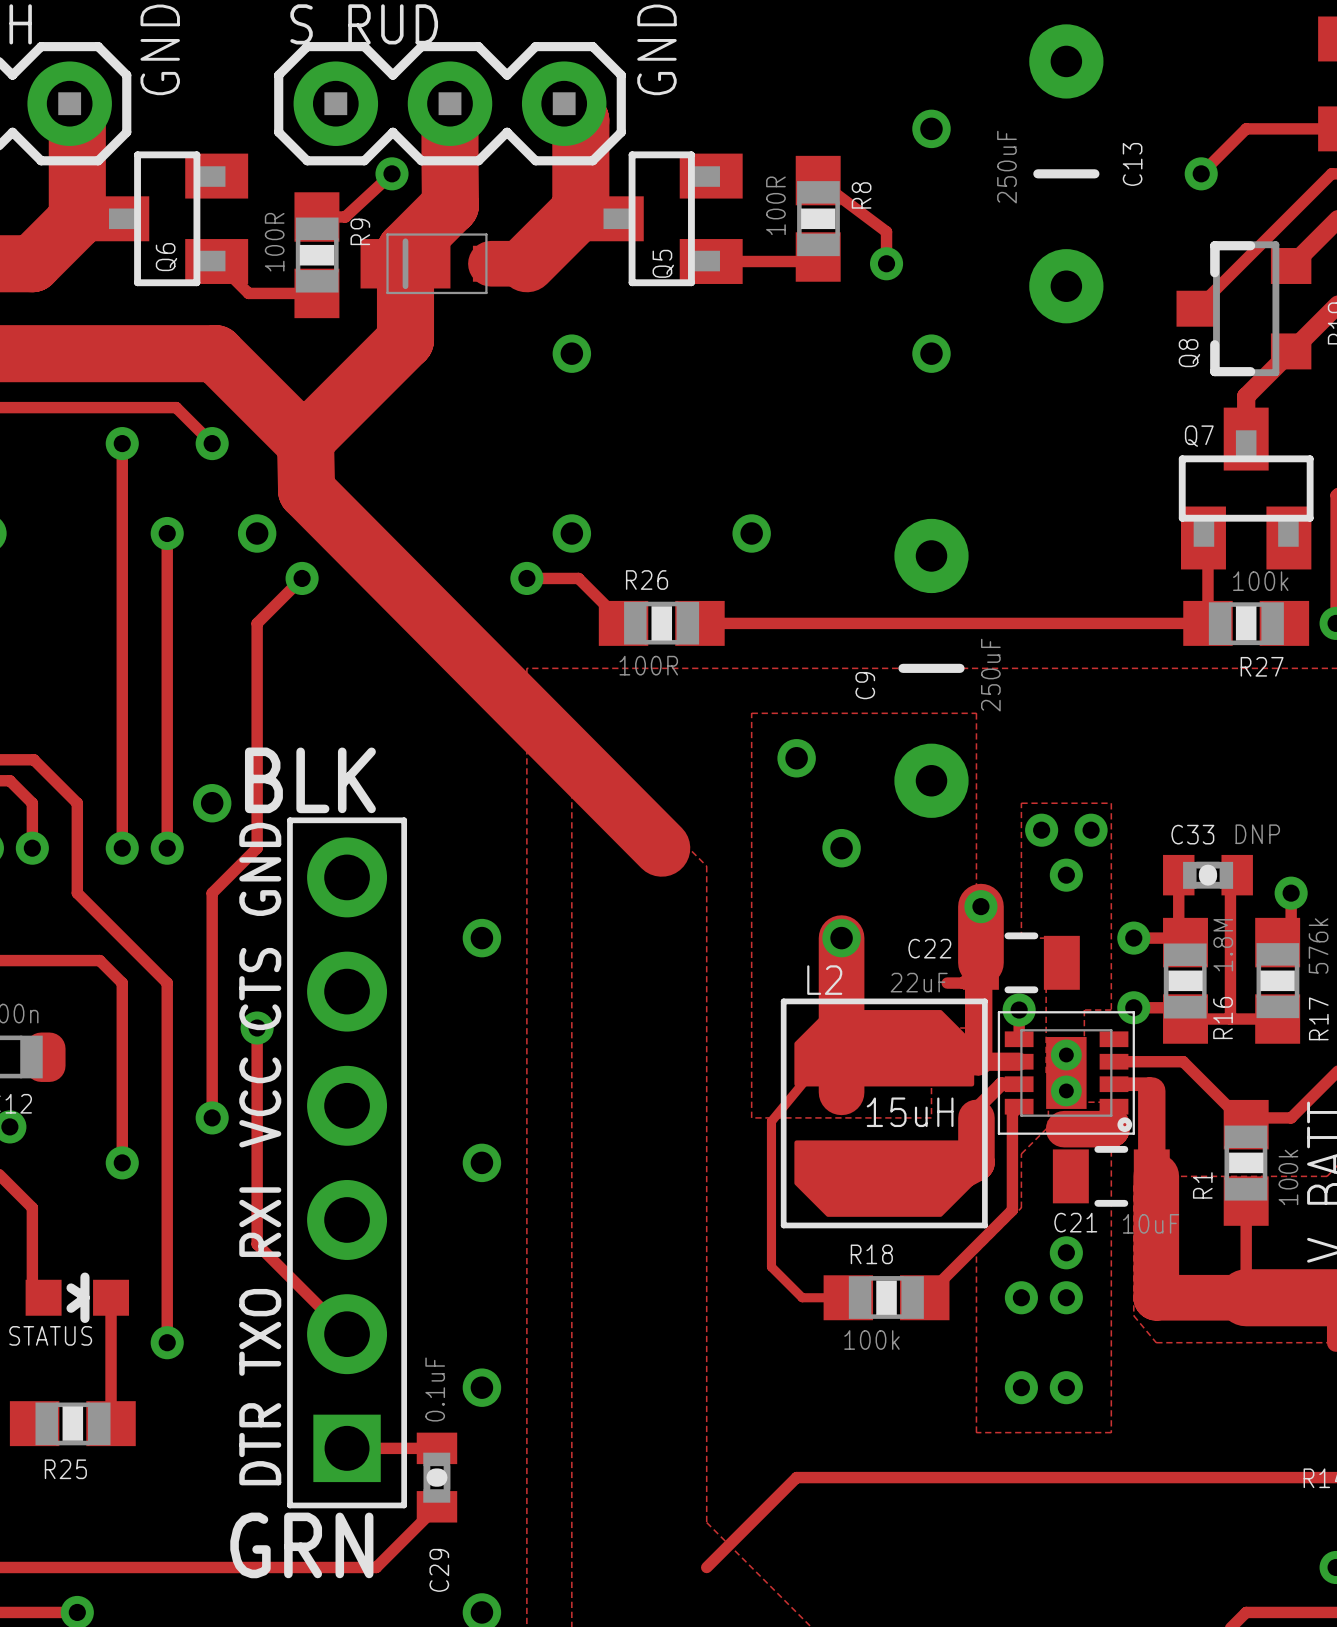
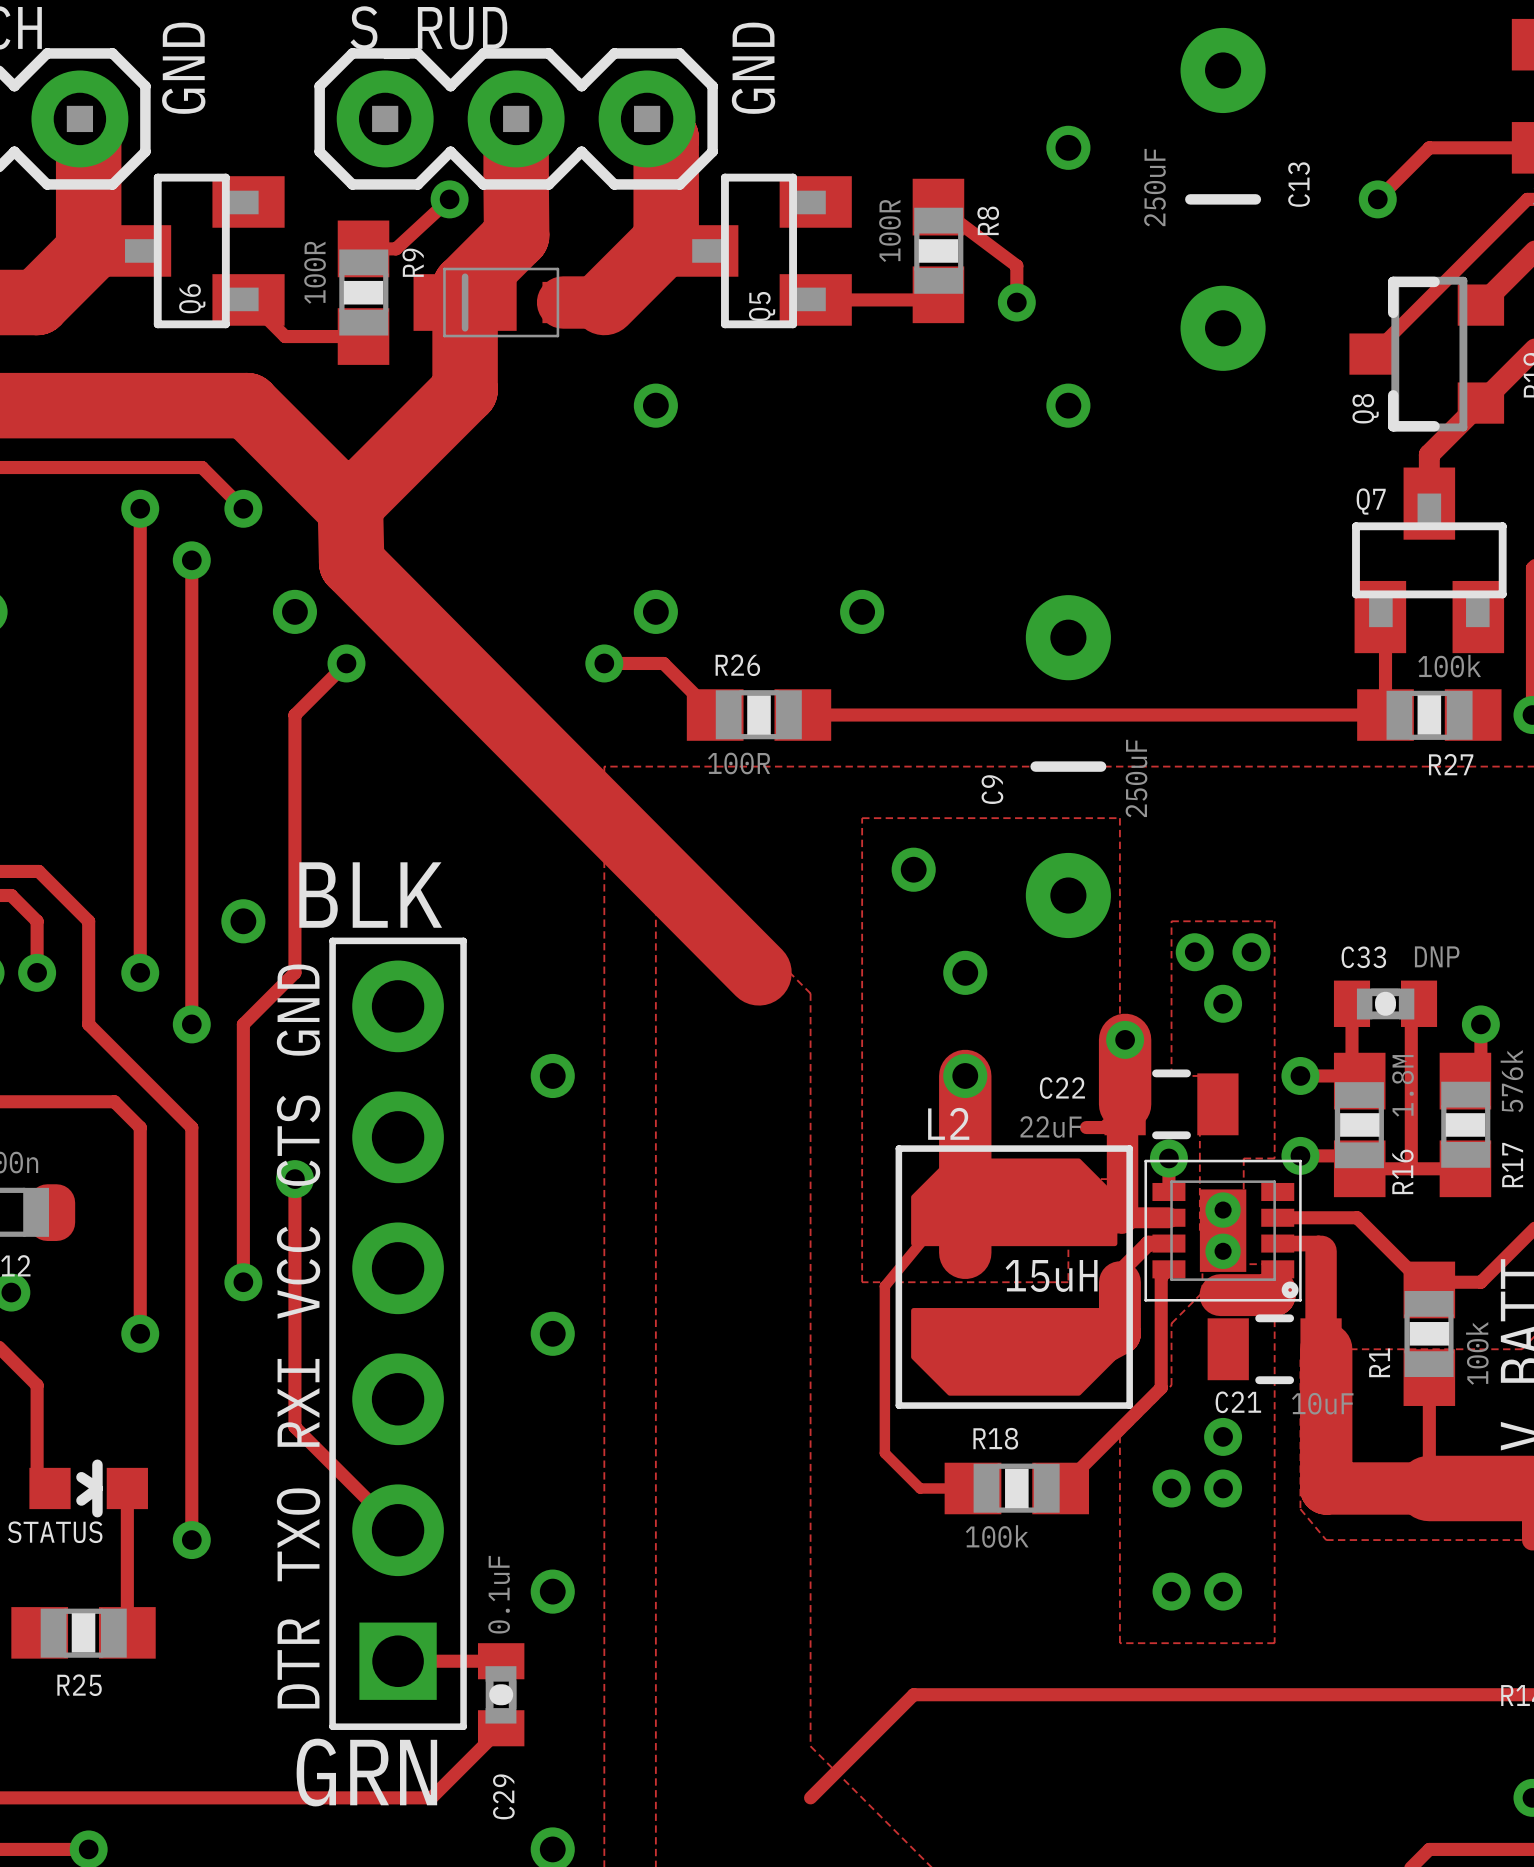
track: none -> (191, 560) (191, 611)
via position: (167, 533) -> (191, 560)
track: none -> (191, 972) (191, 1024)
via position: (167, 848) -> (191, 1024)

